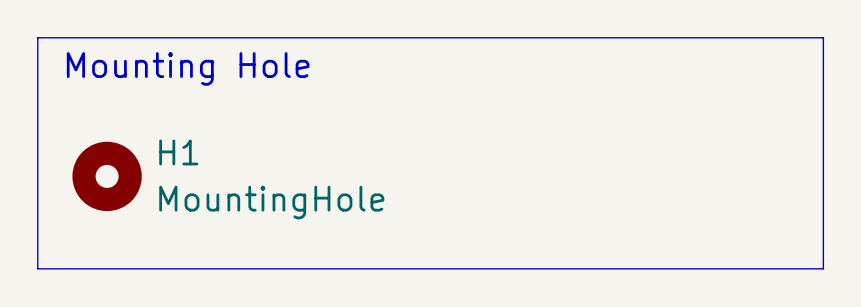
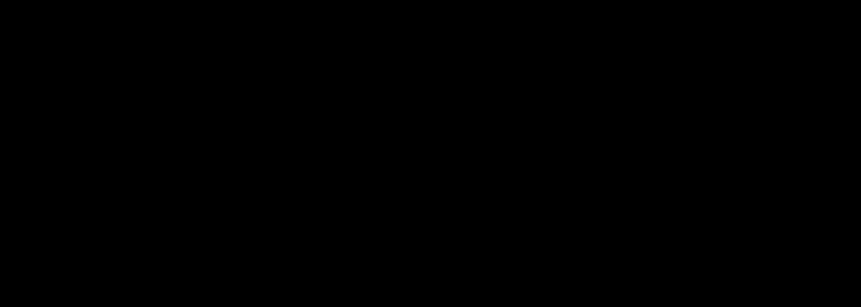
line: (37, 37) (823, 37) (823, 268) (37, 268) (37, 37) -> none
text: Mounting Hole (188, 68) -> none
H1: MountingHole (107, 176) -> none

